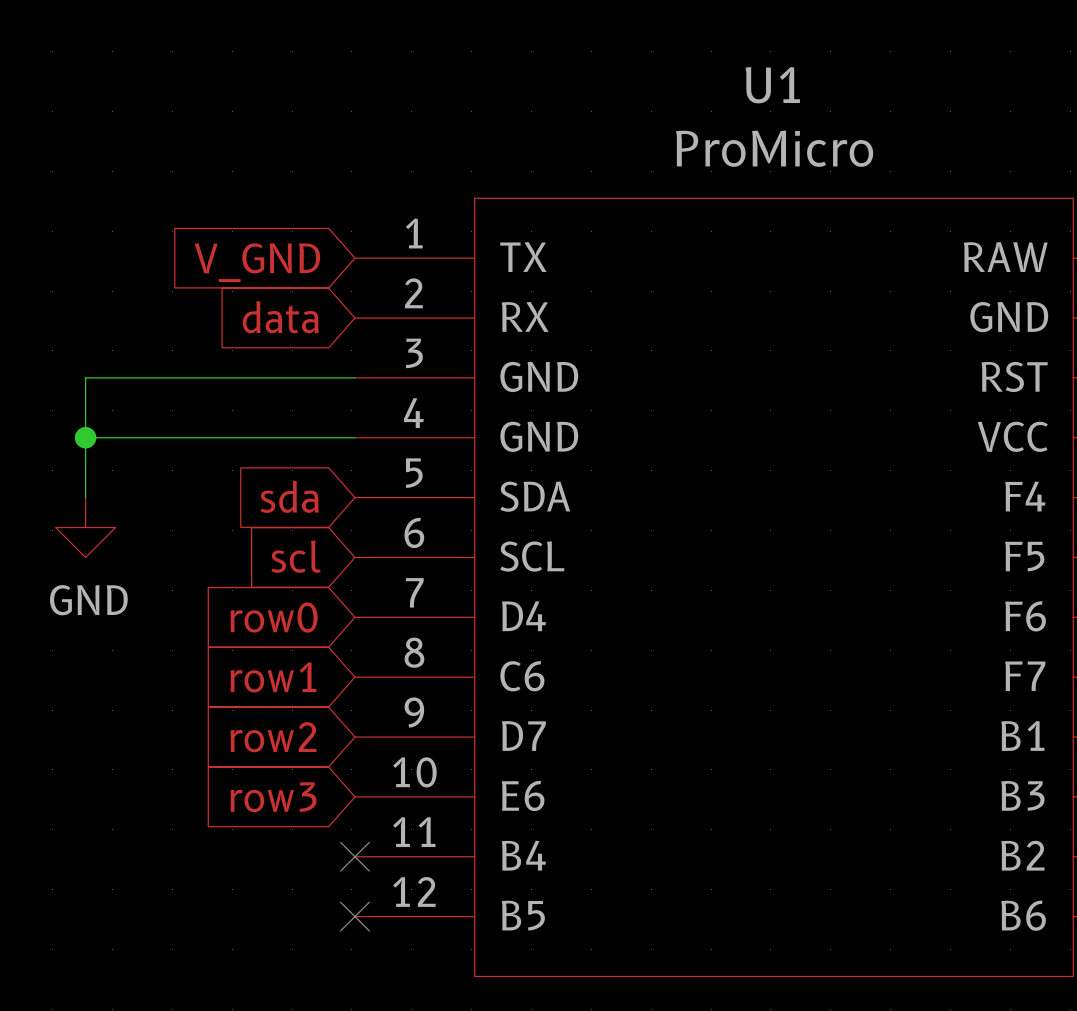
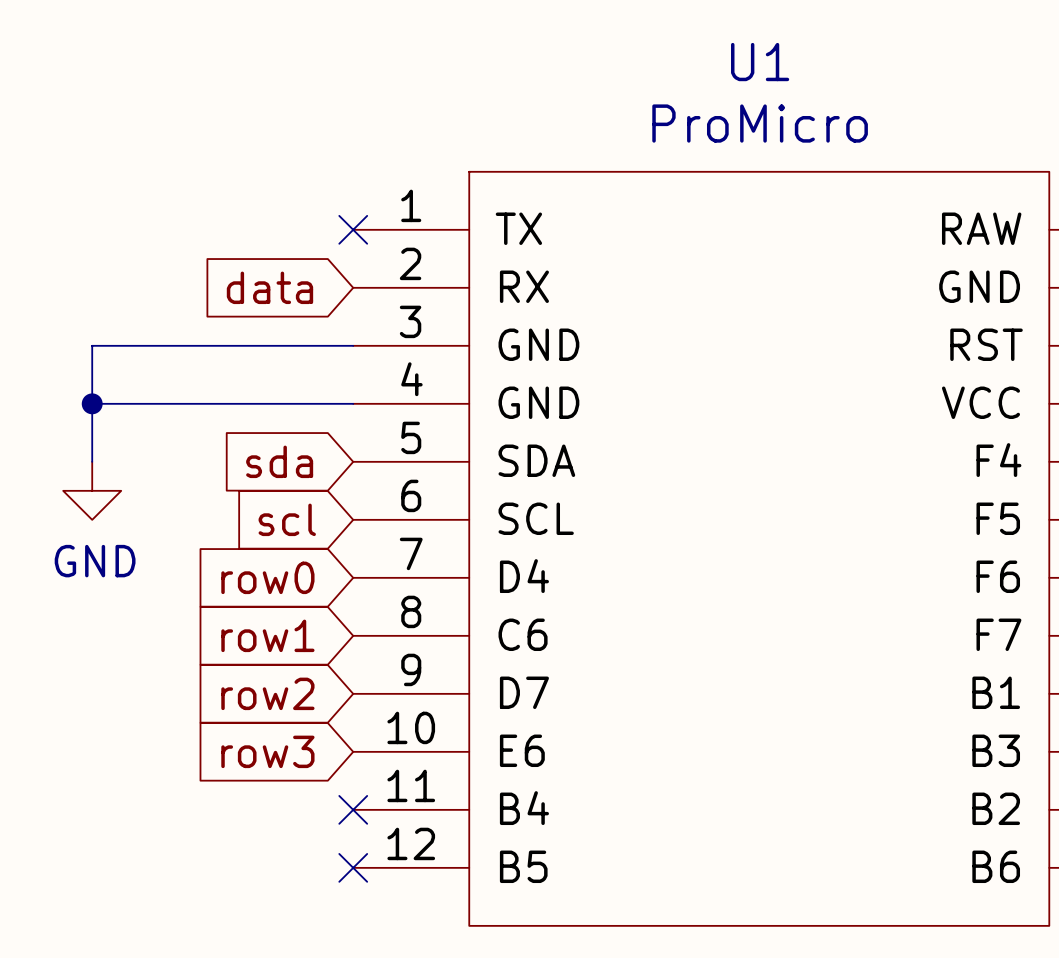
no-connect mark: none -> (353, 229)
global label: V_GND (257, 262) -> none

